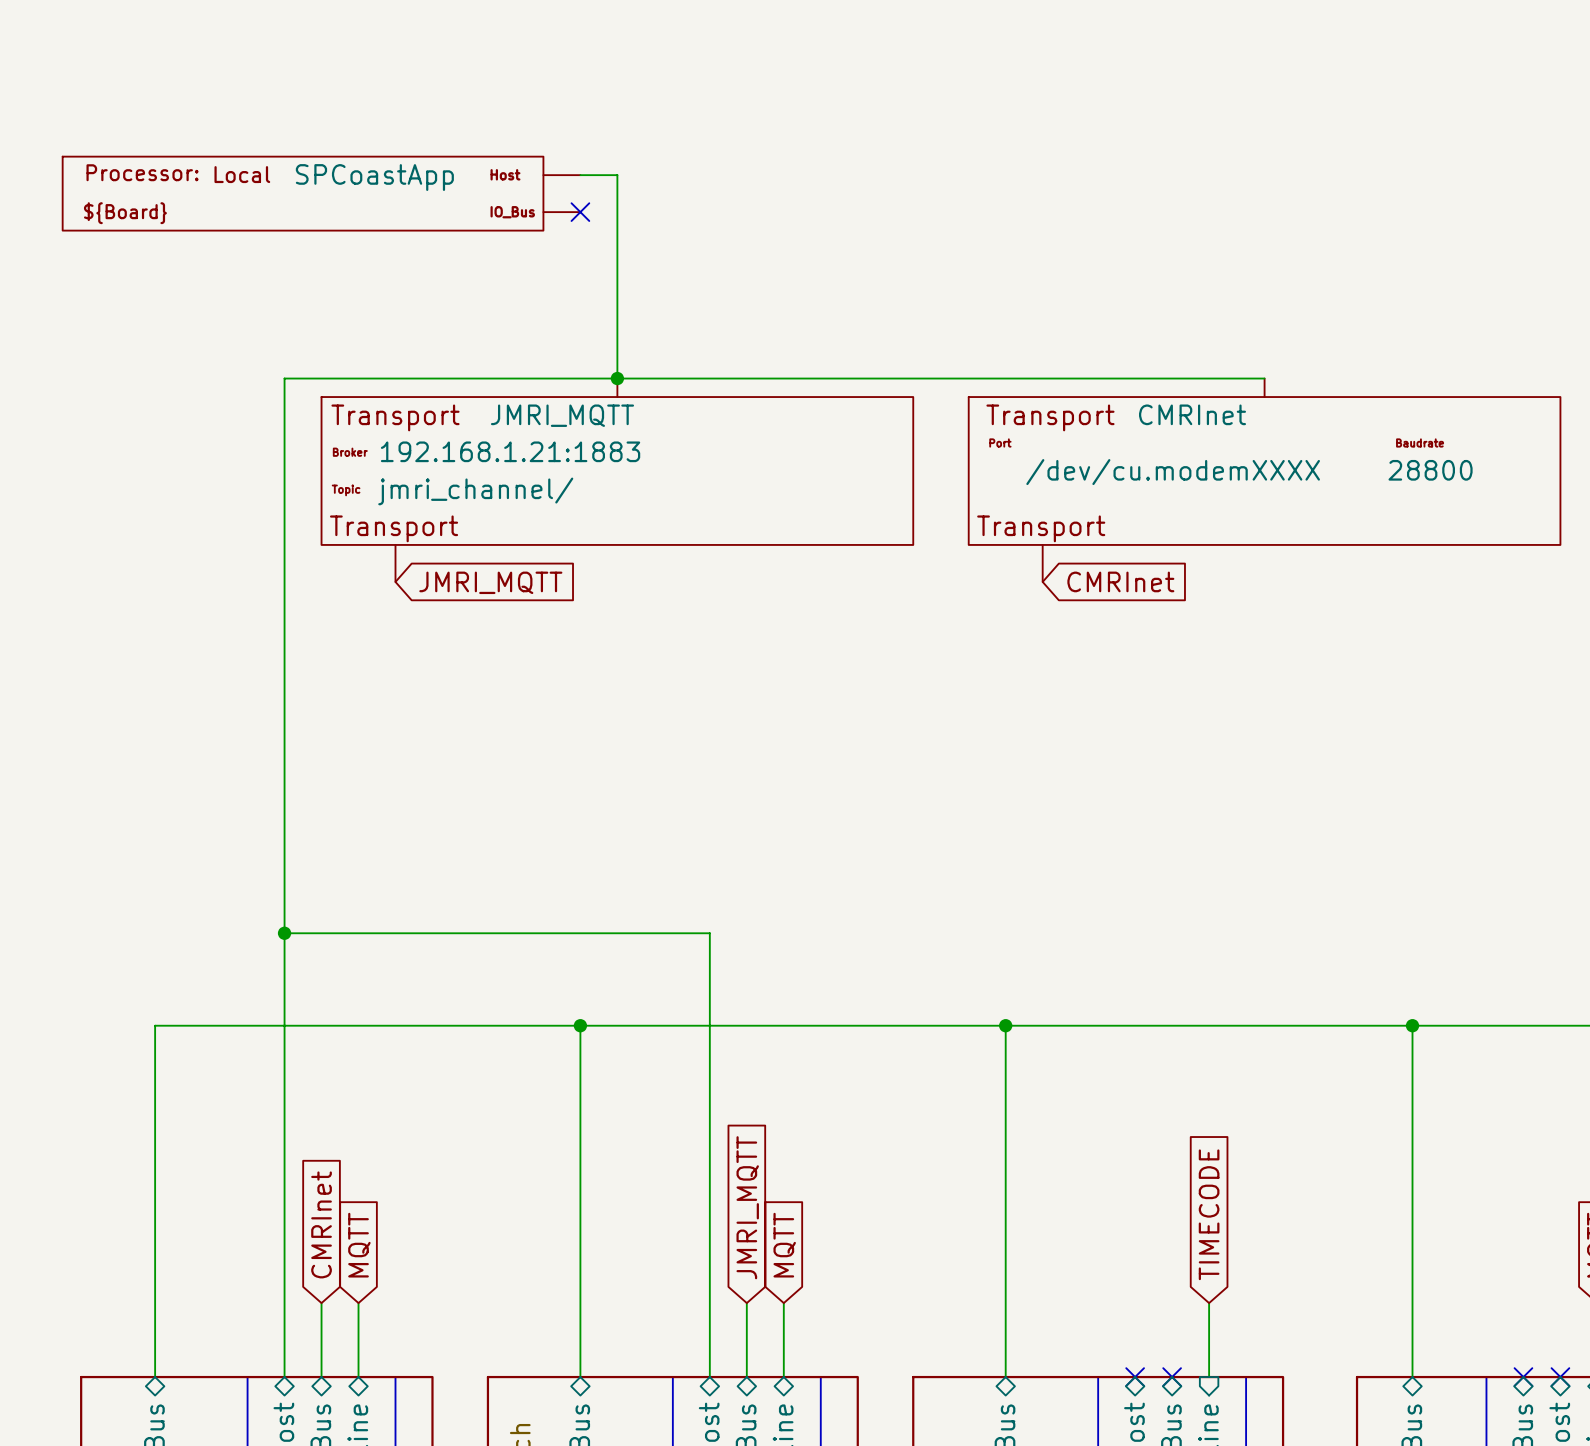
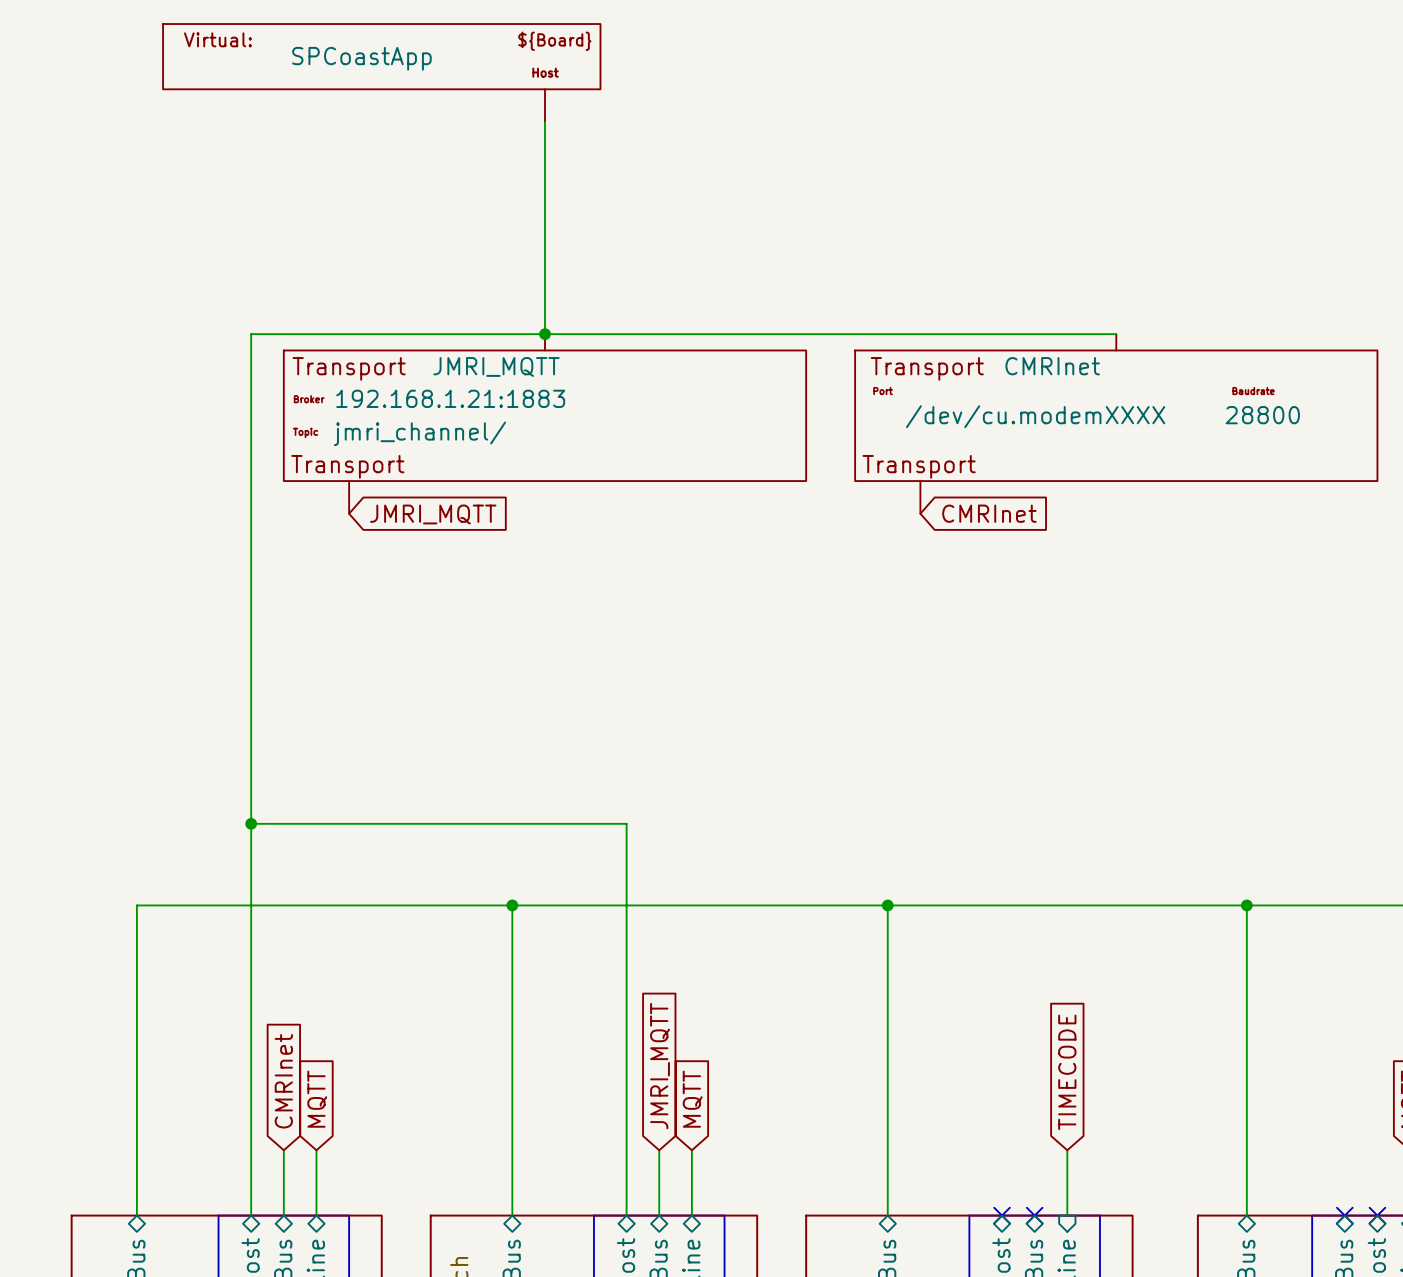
part: none -> SPCoastApp (381, 72)
wire: (580, 175) (617, 175) -> (544, 121) (544, 154)
part: SPCoastApp (321, 193) -> none
no-connect mark: (580, 212) -> none

